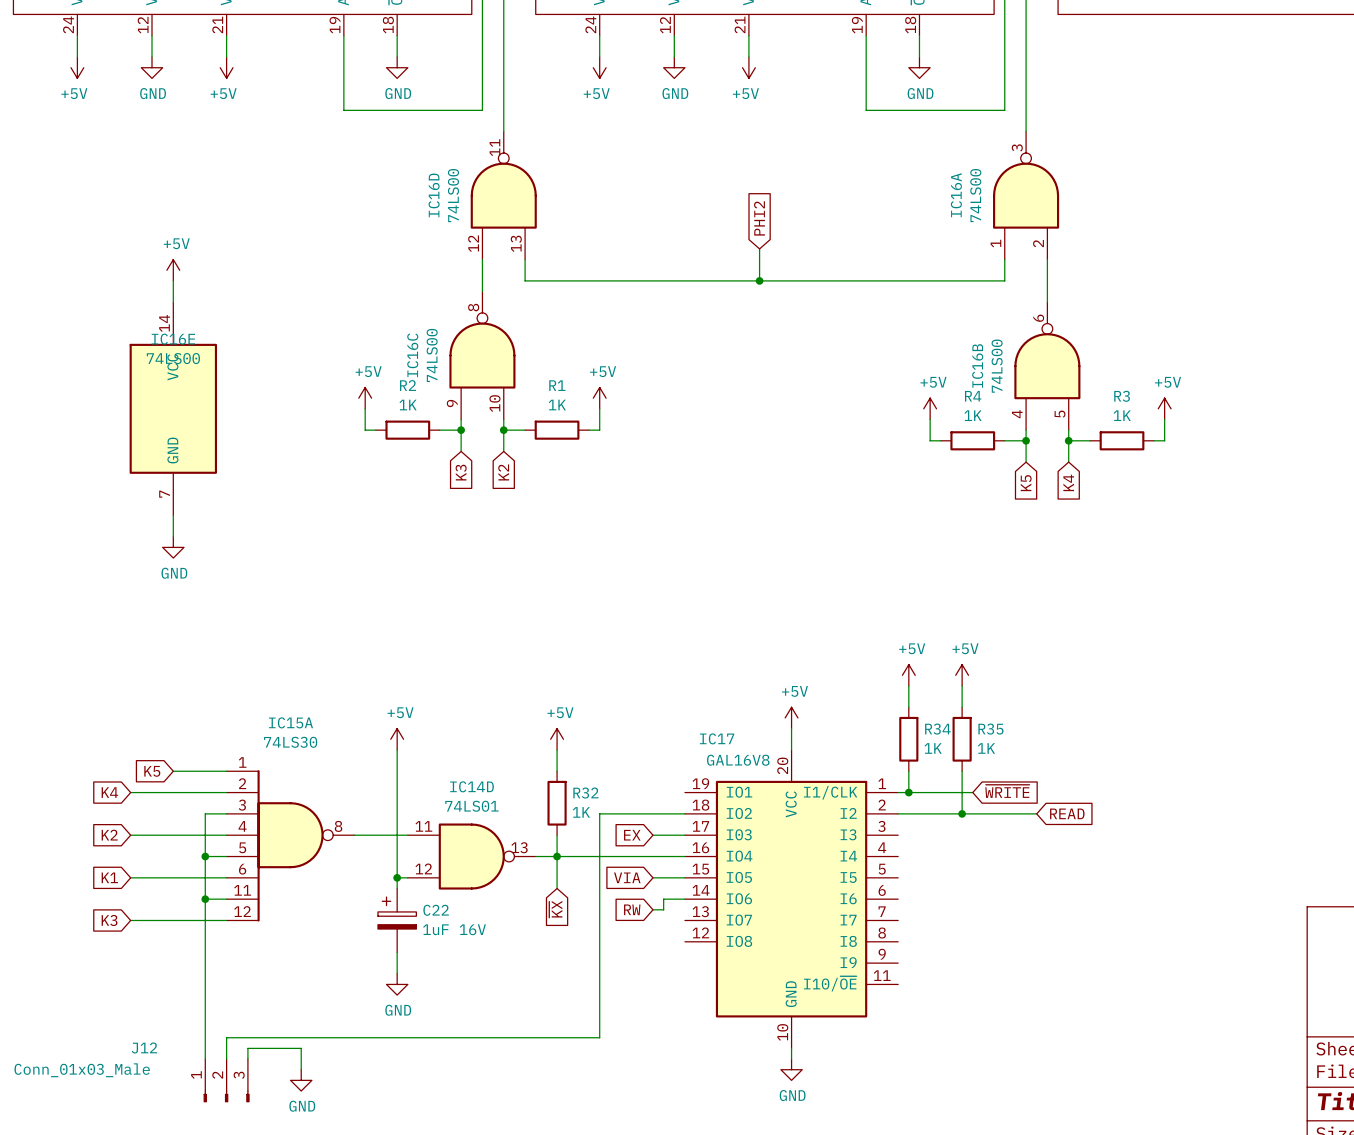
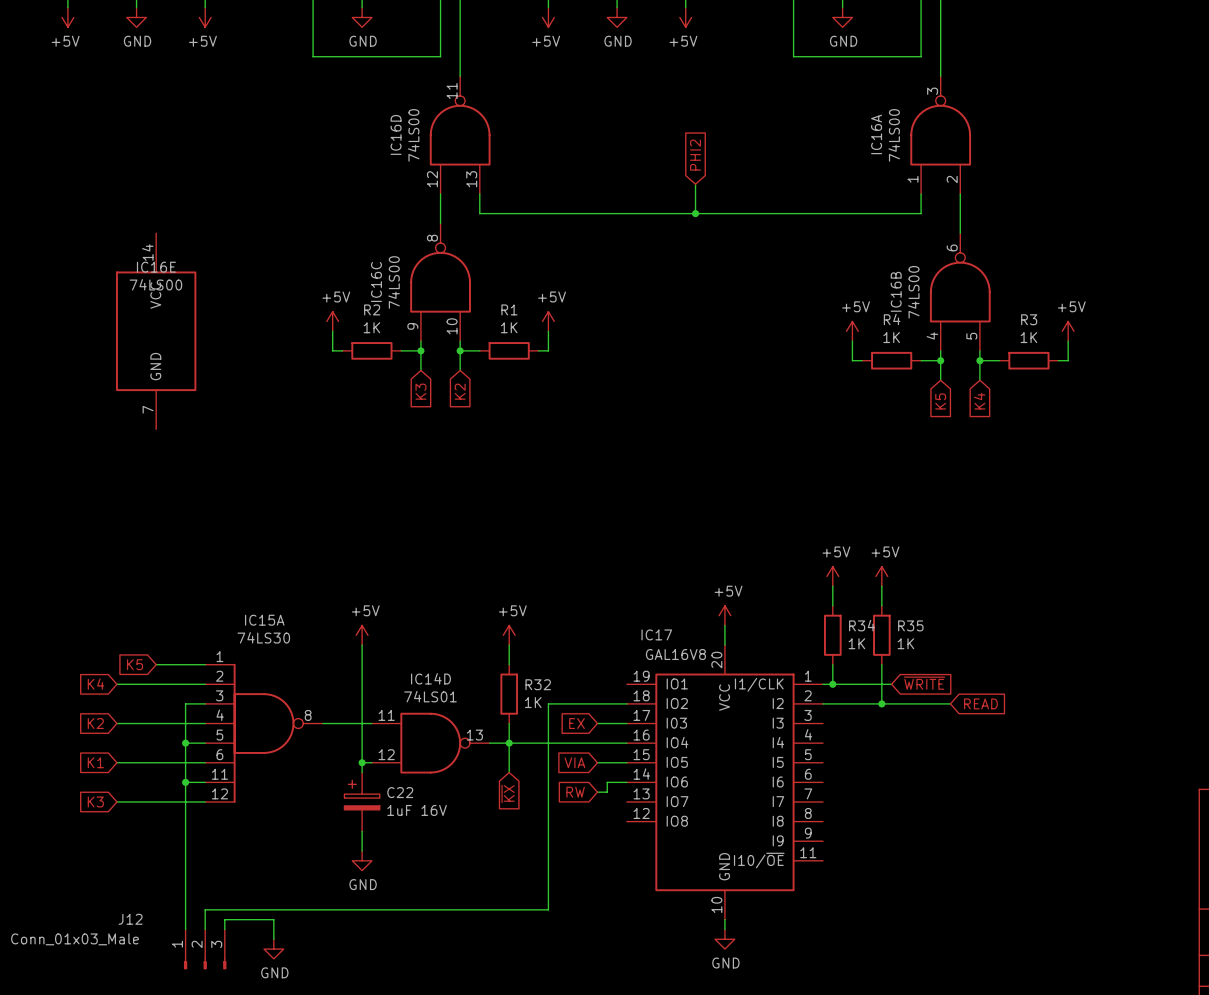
power symbol: +5V (173, 270) -> none
wire: (173, 280) (173, 302) -> none
wire: (173, 515) (173, 536) -> none
power symbol: GND (173, 547) -> none

